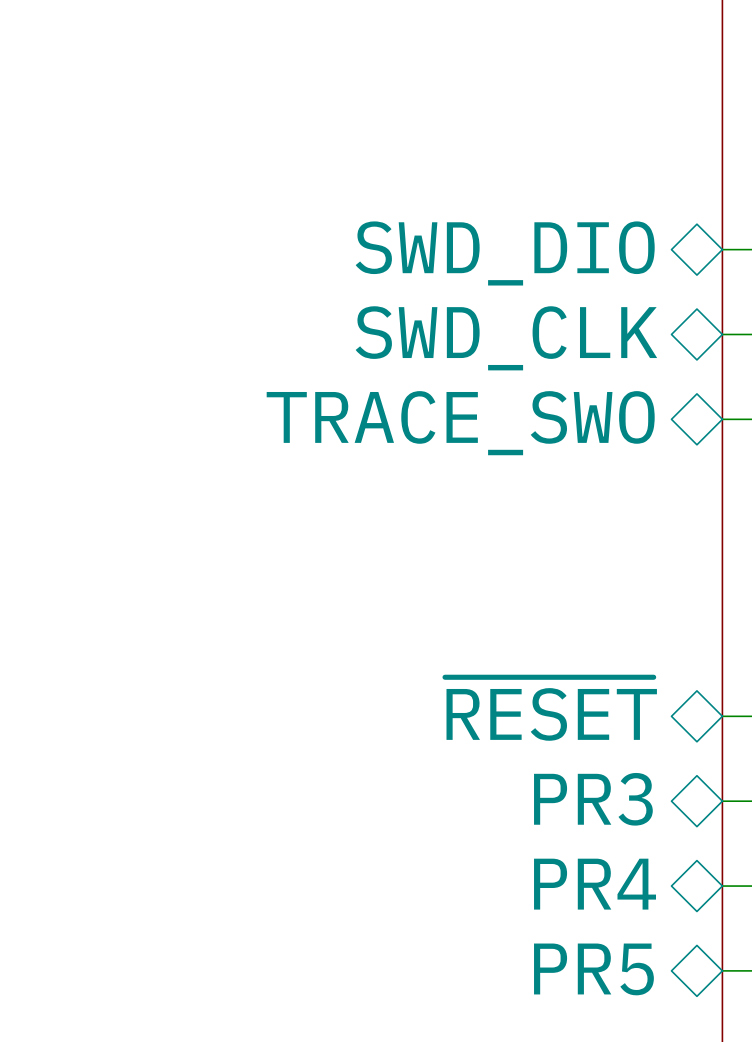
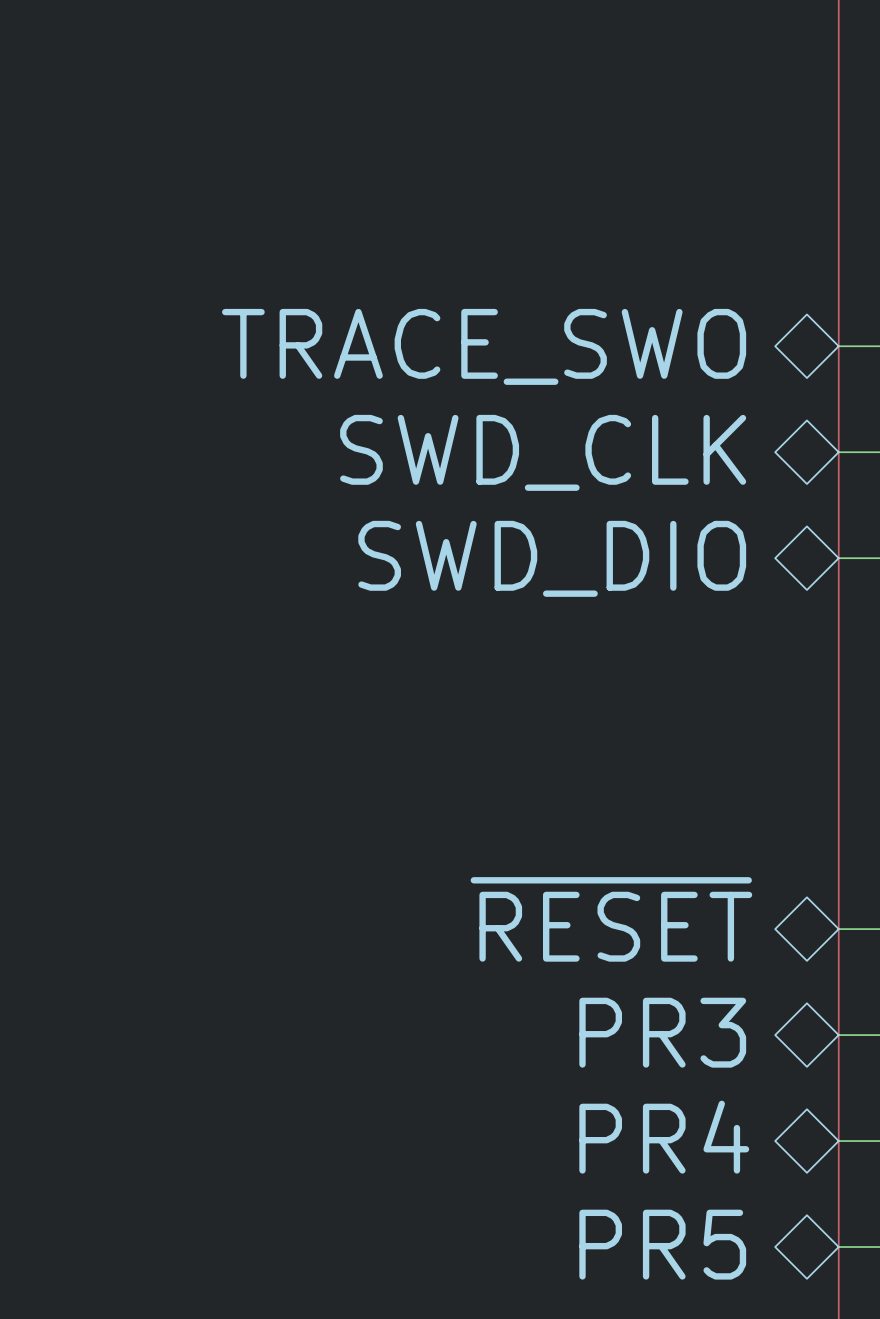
sheet pin: SWD_DIO (505, 253) -> TRACE_SWO (484, 346)
sheet pin: TRACE_SWO (460, 423) -> SWD_DIO (552, 558)

